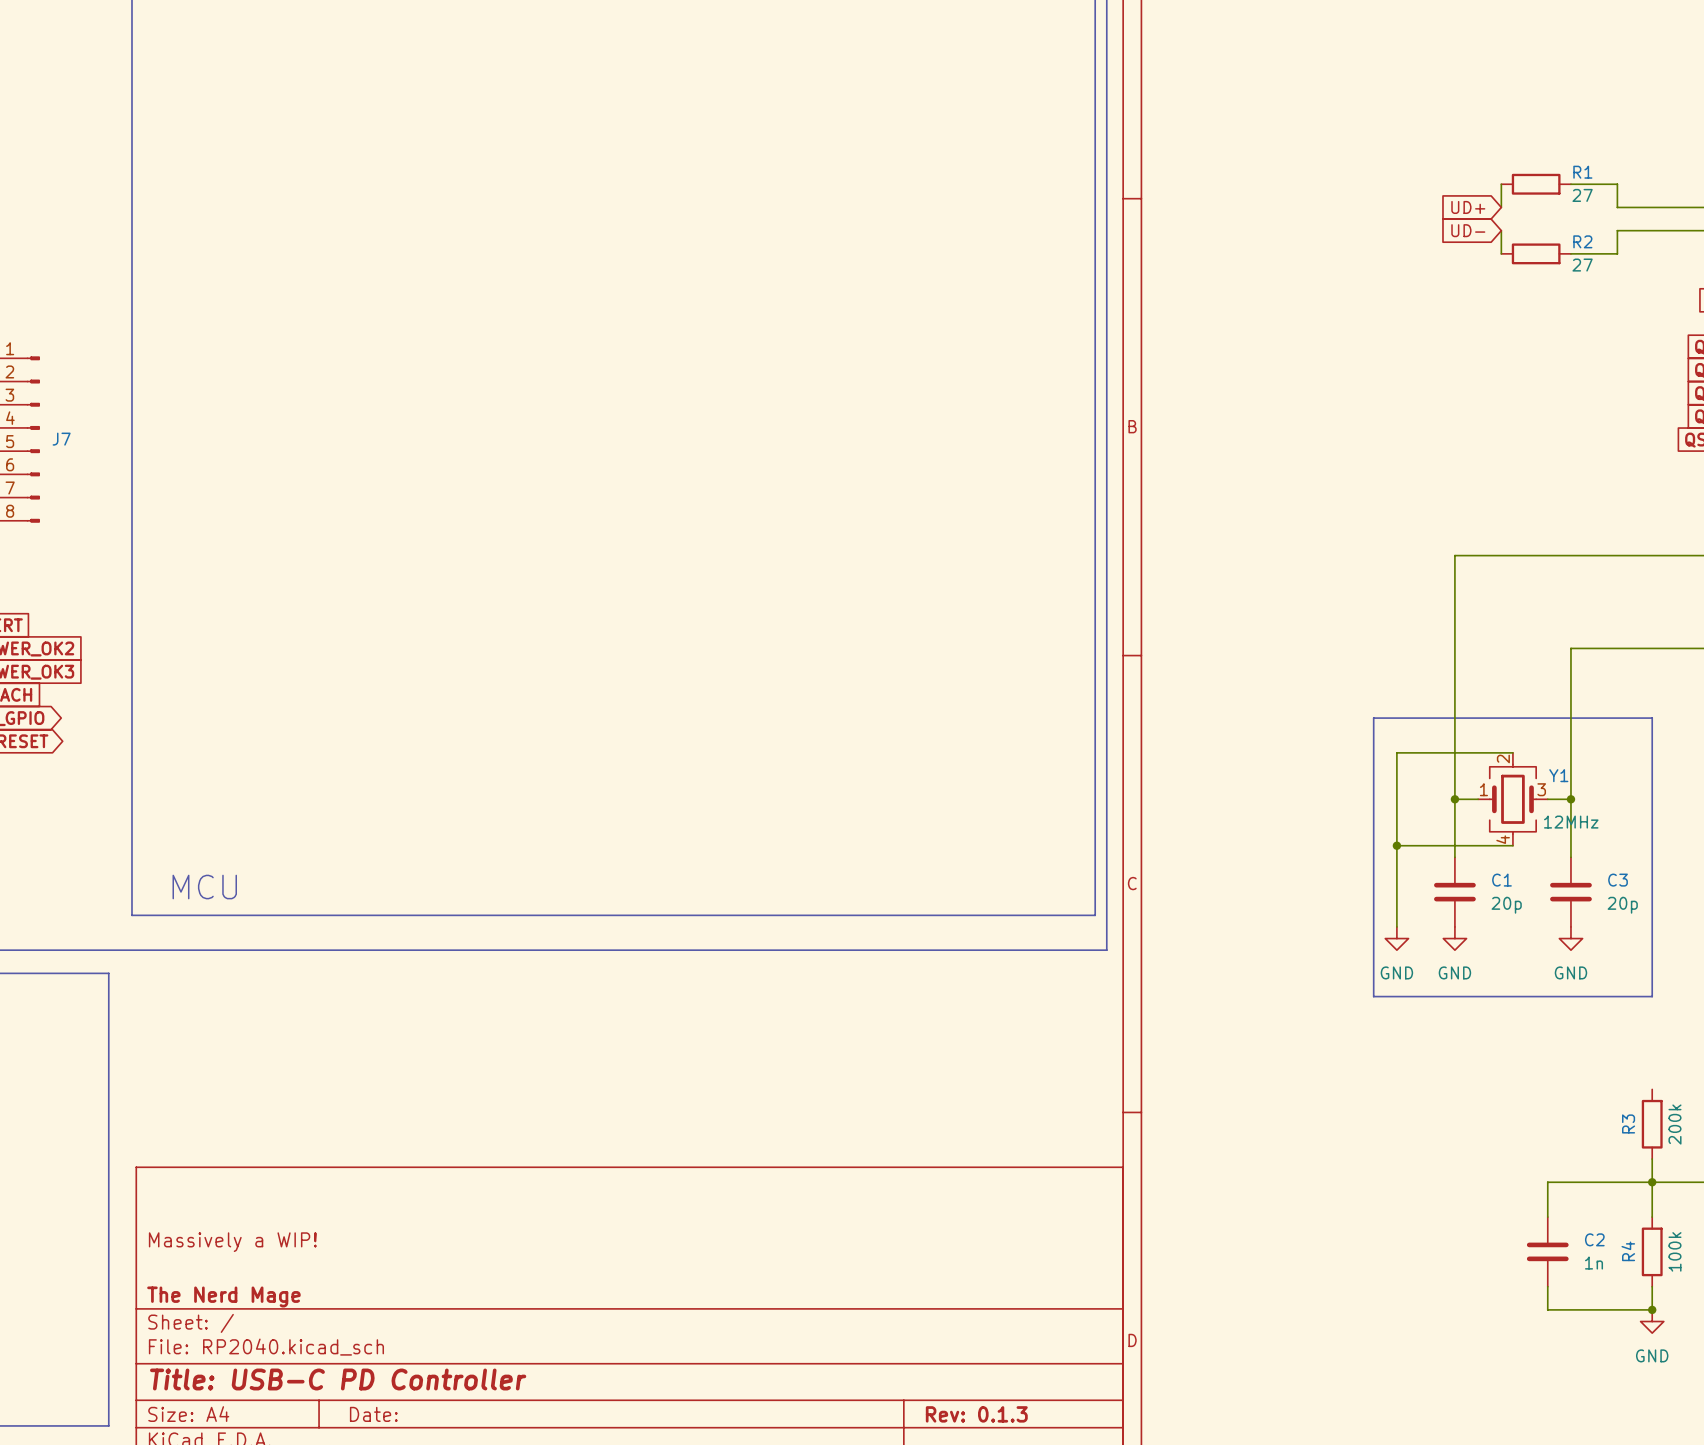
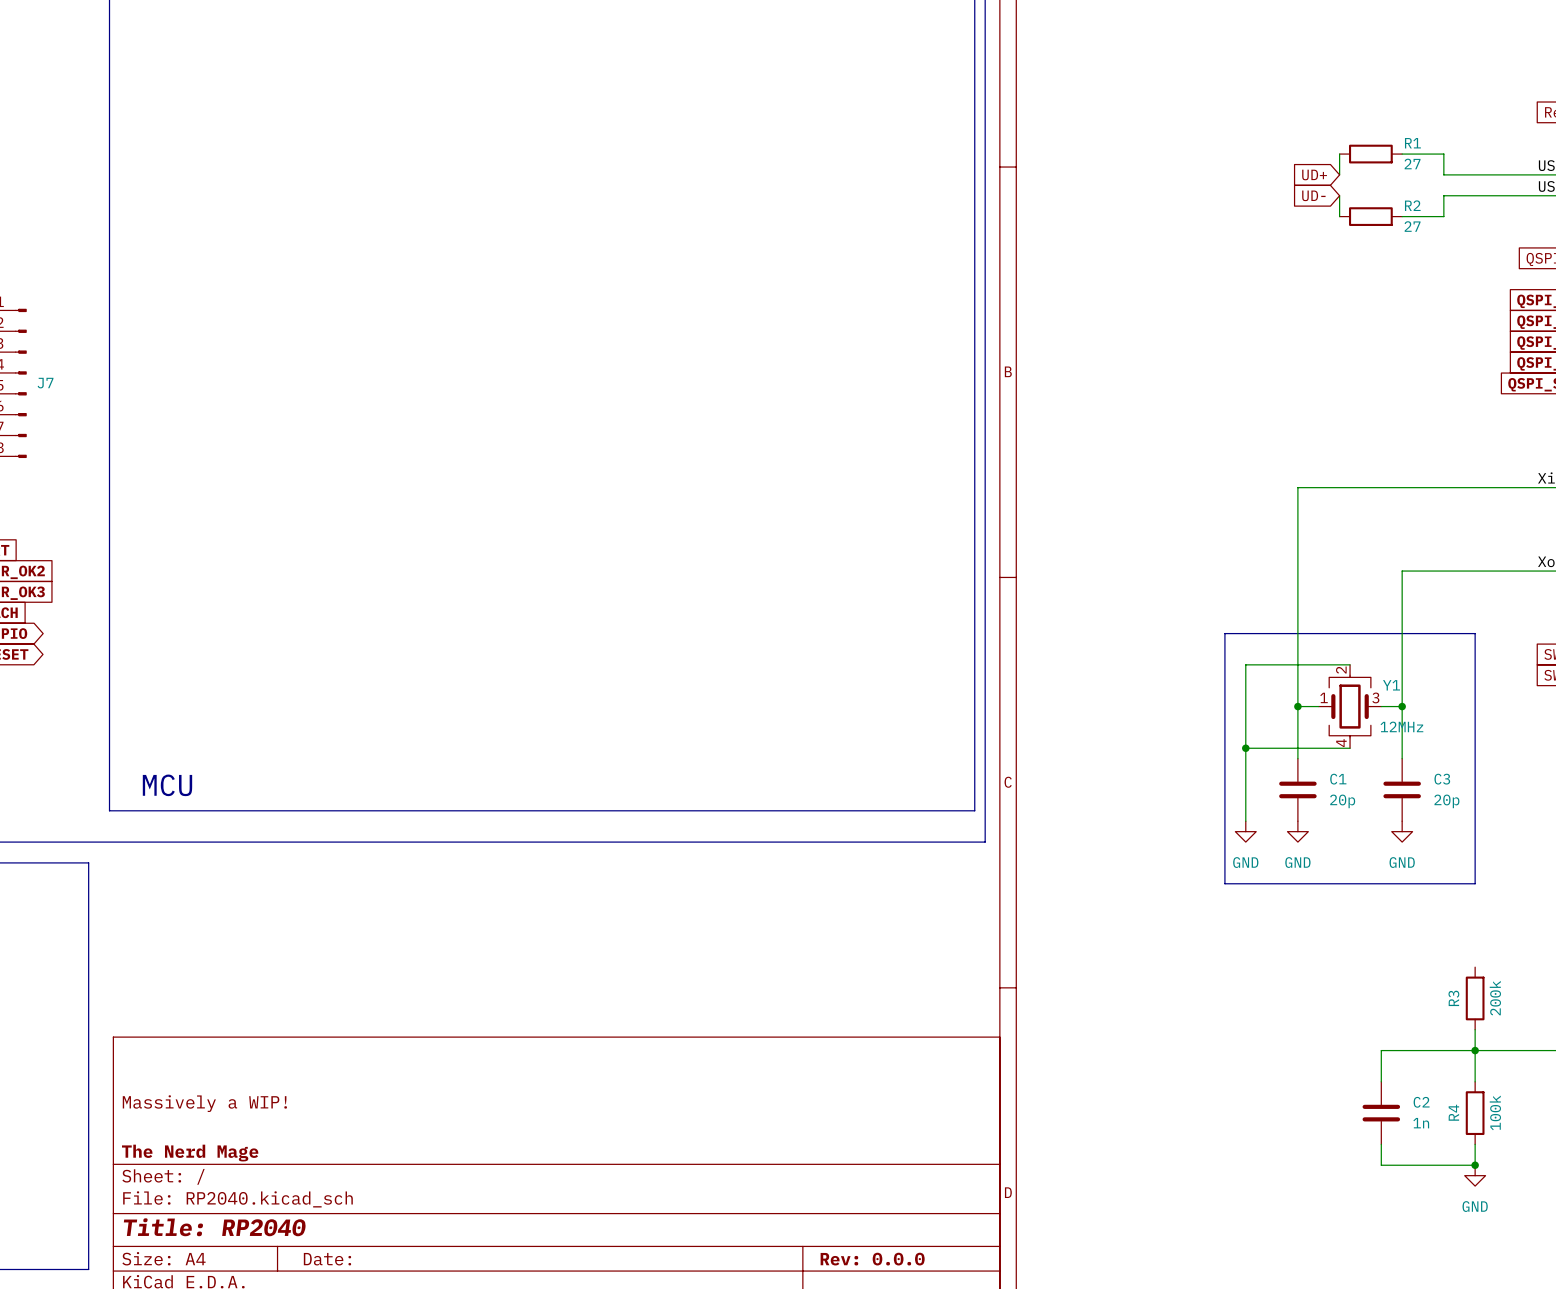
title block: Title: USB-C PD Controller (338, 1379) -> Title: RP2040 (214, 1227)
title block: Rev: 0.1.3 (976, 1414) -> Rev: 0.0.0 (872, 1259)

